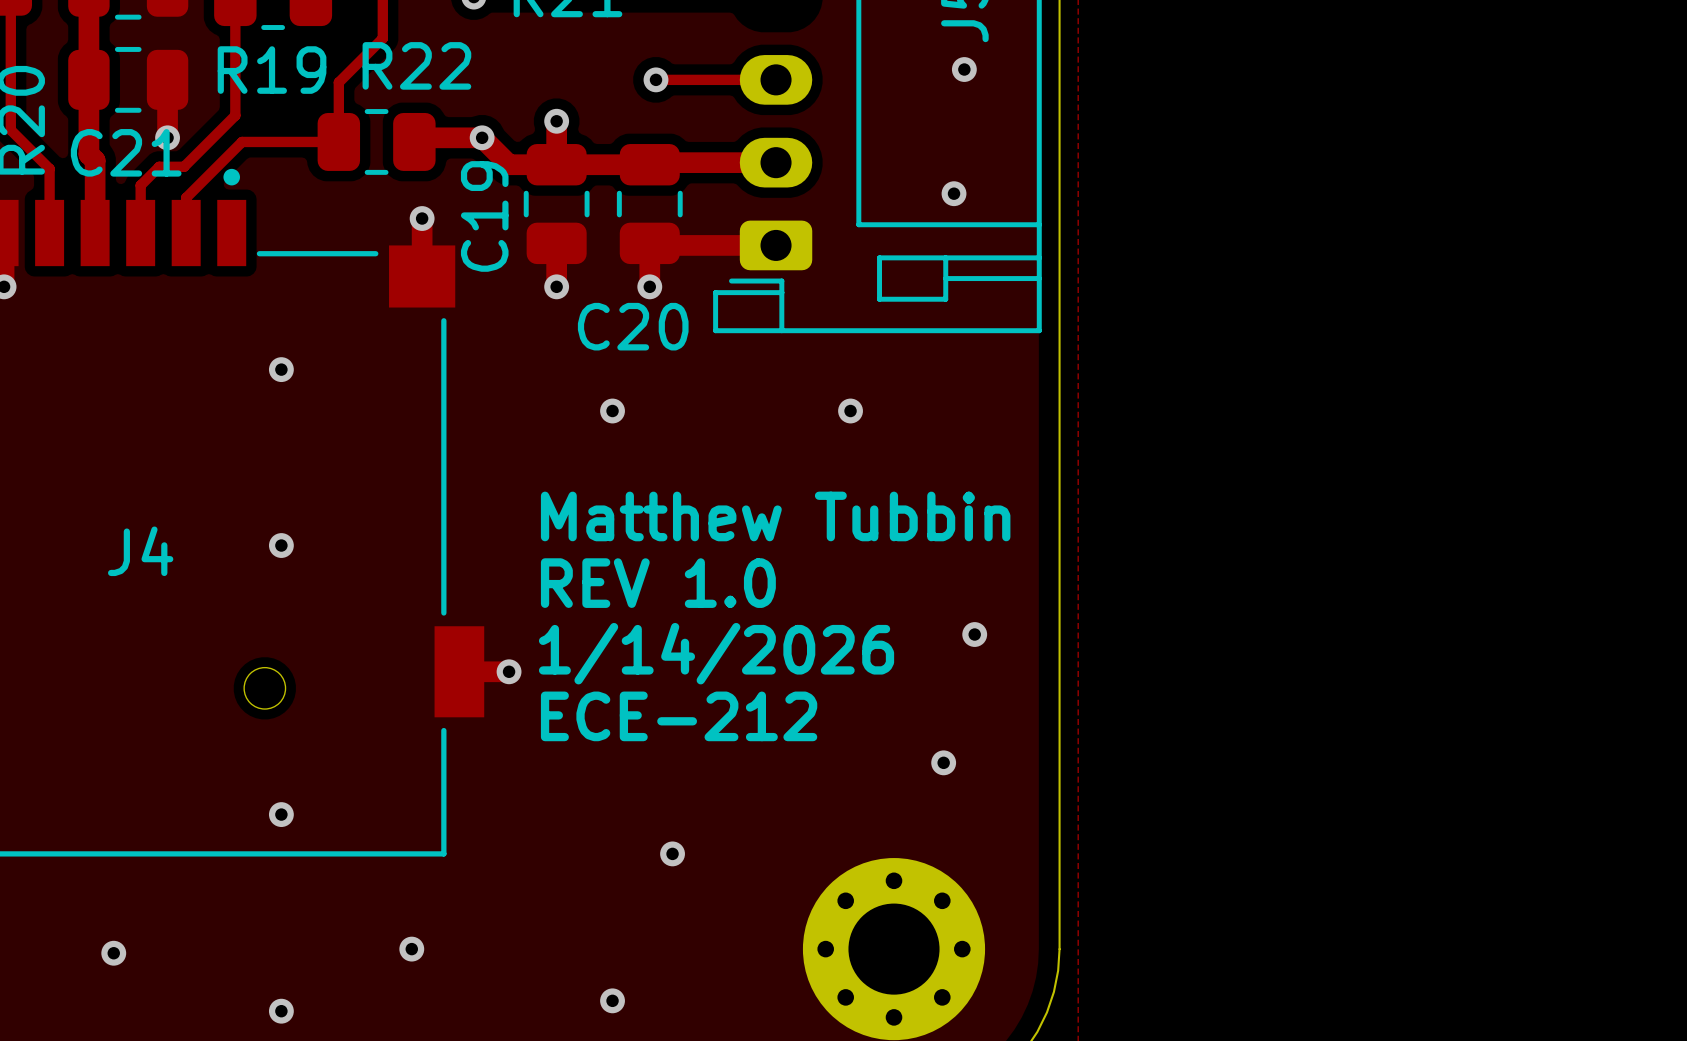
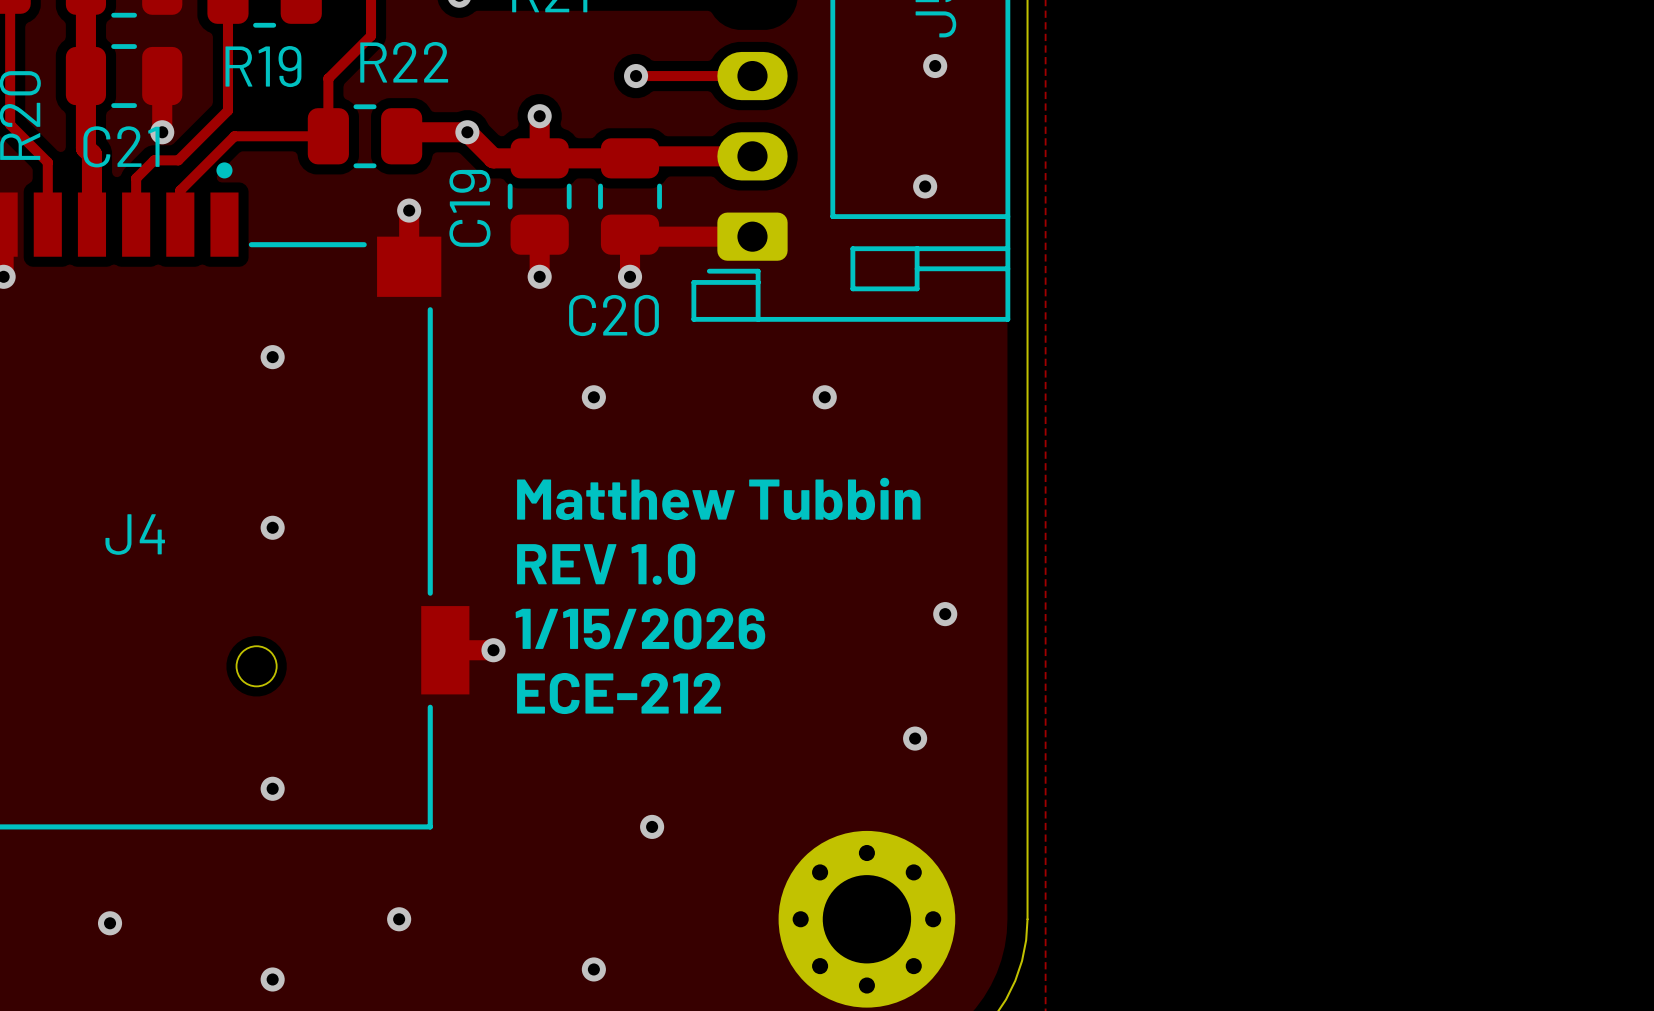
text: 1/14/2026 (716, 653) -> 1/15/2026 (640, 628)

